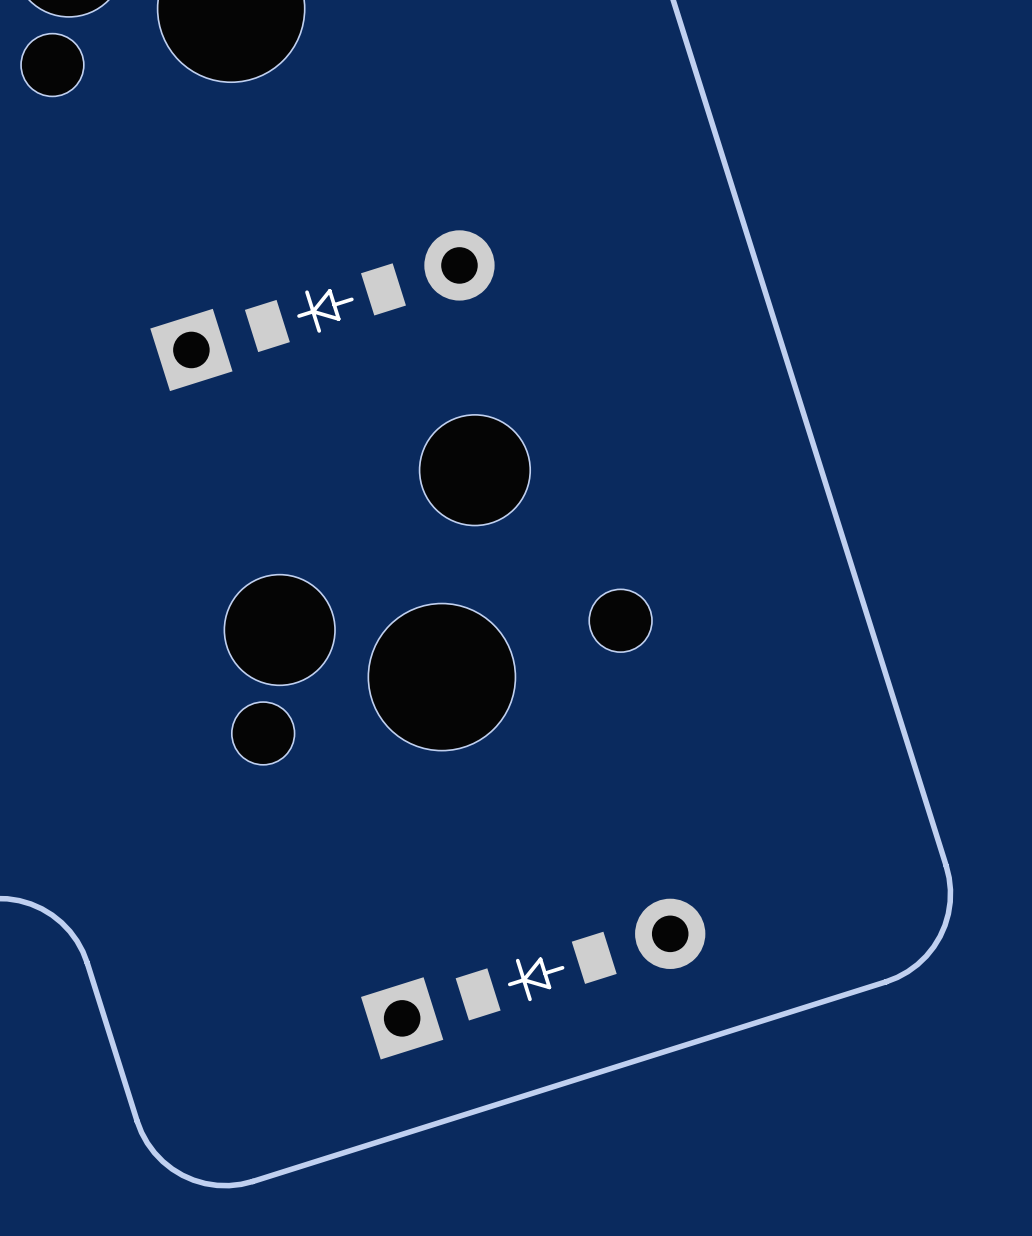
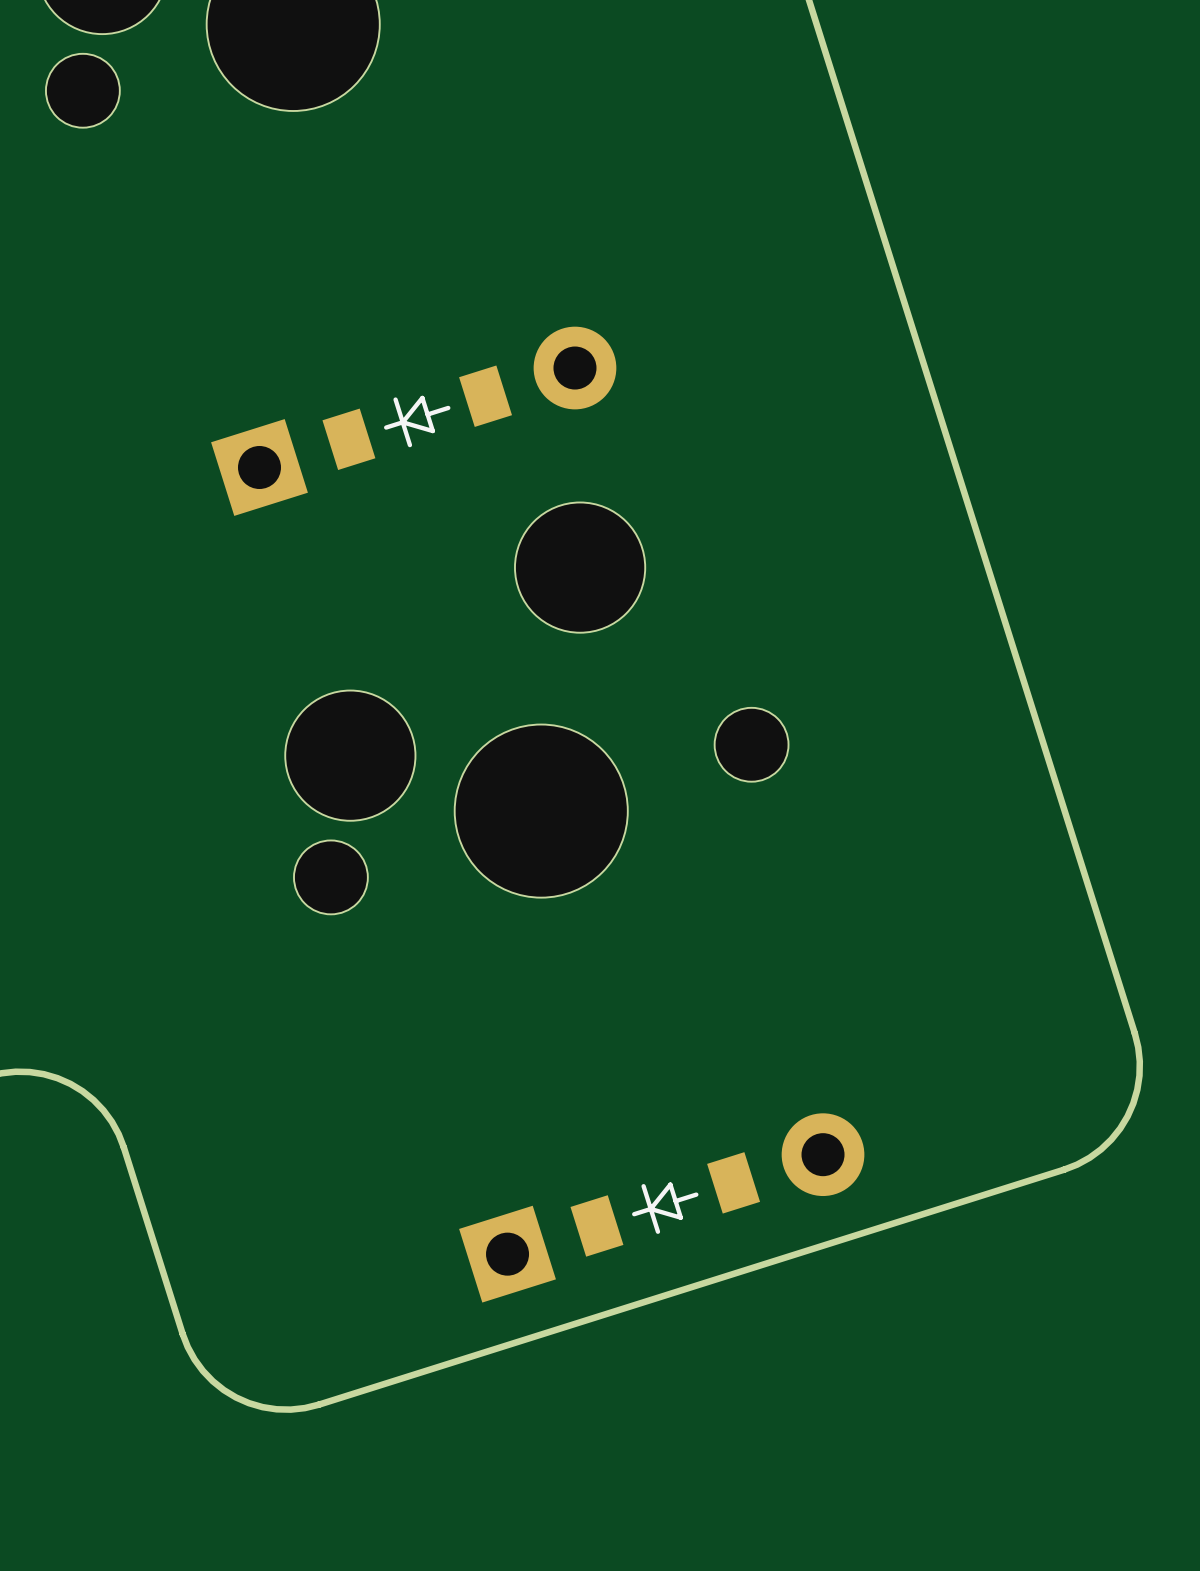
part position: (322, 310) -> (413, 421)
part position: (533, 979) -> (661, 1207)

